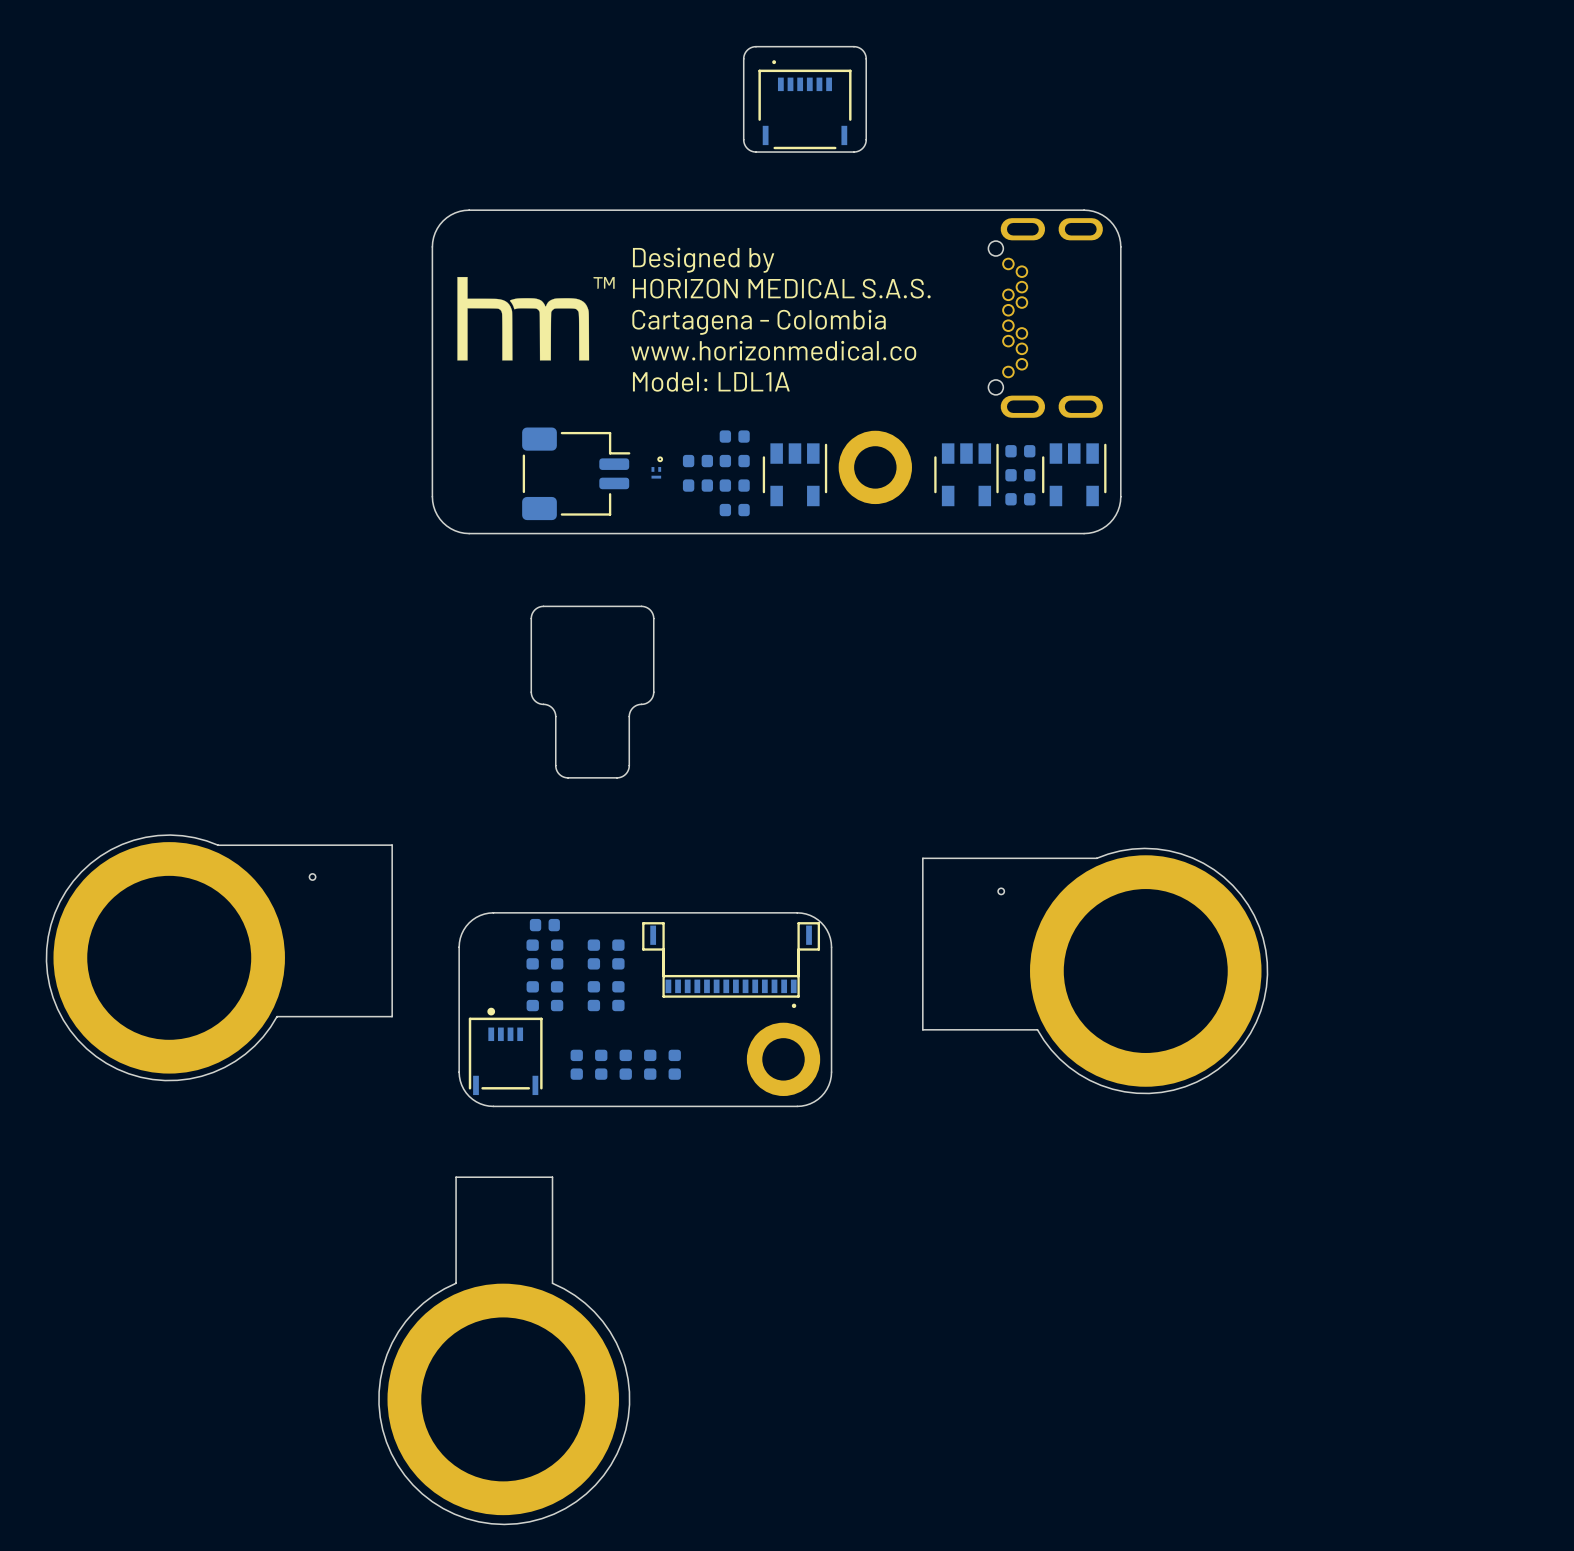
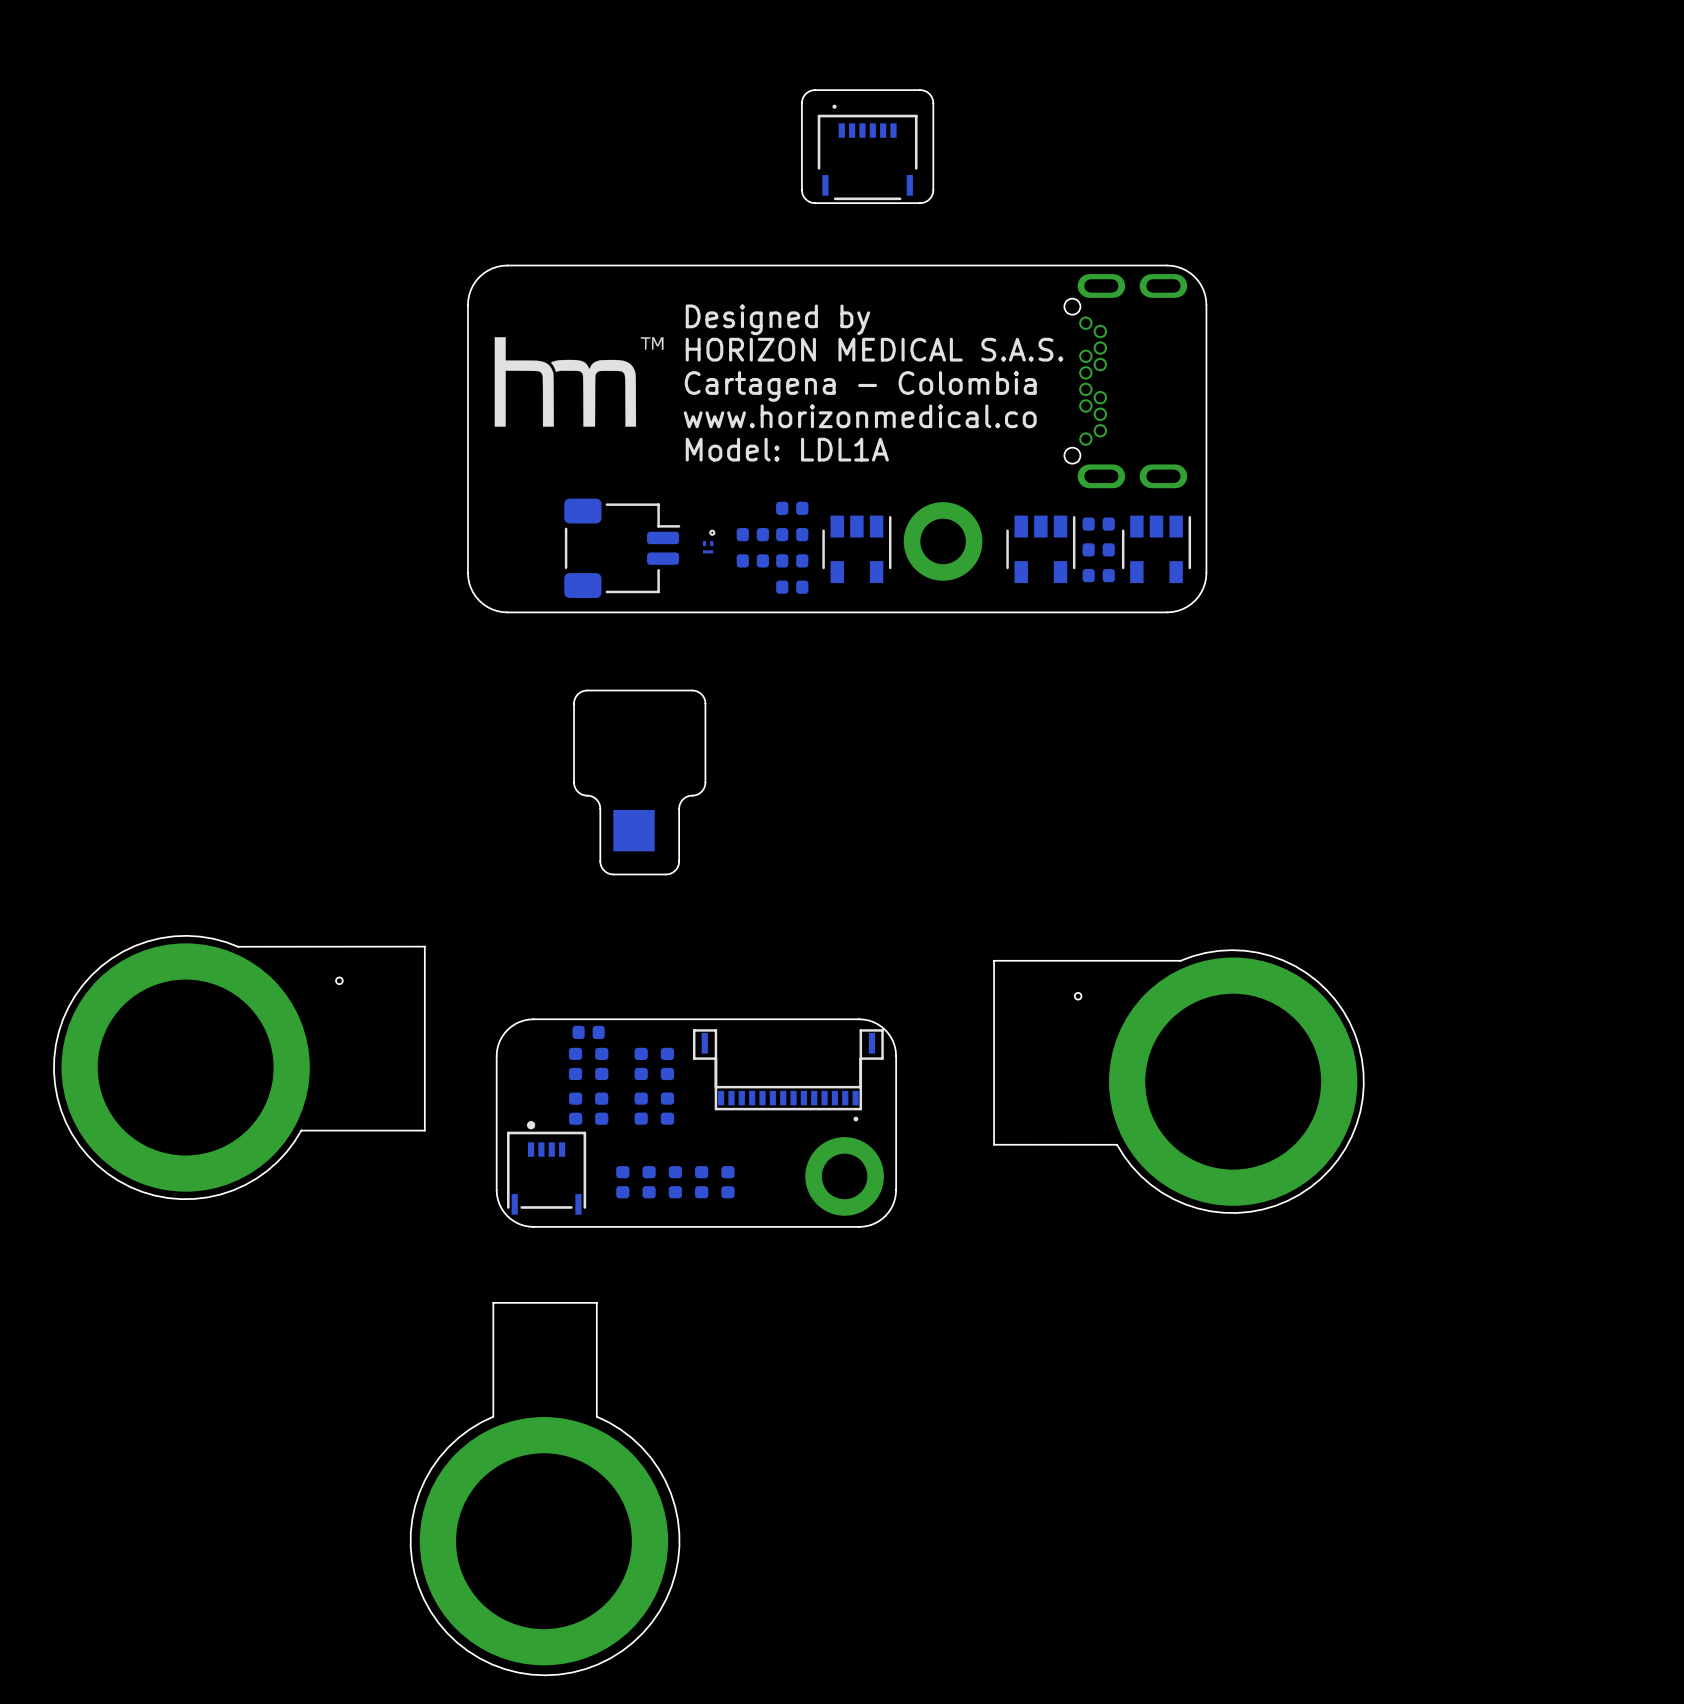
part: none -> (634, 830)

